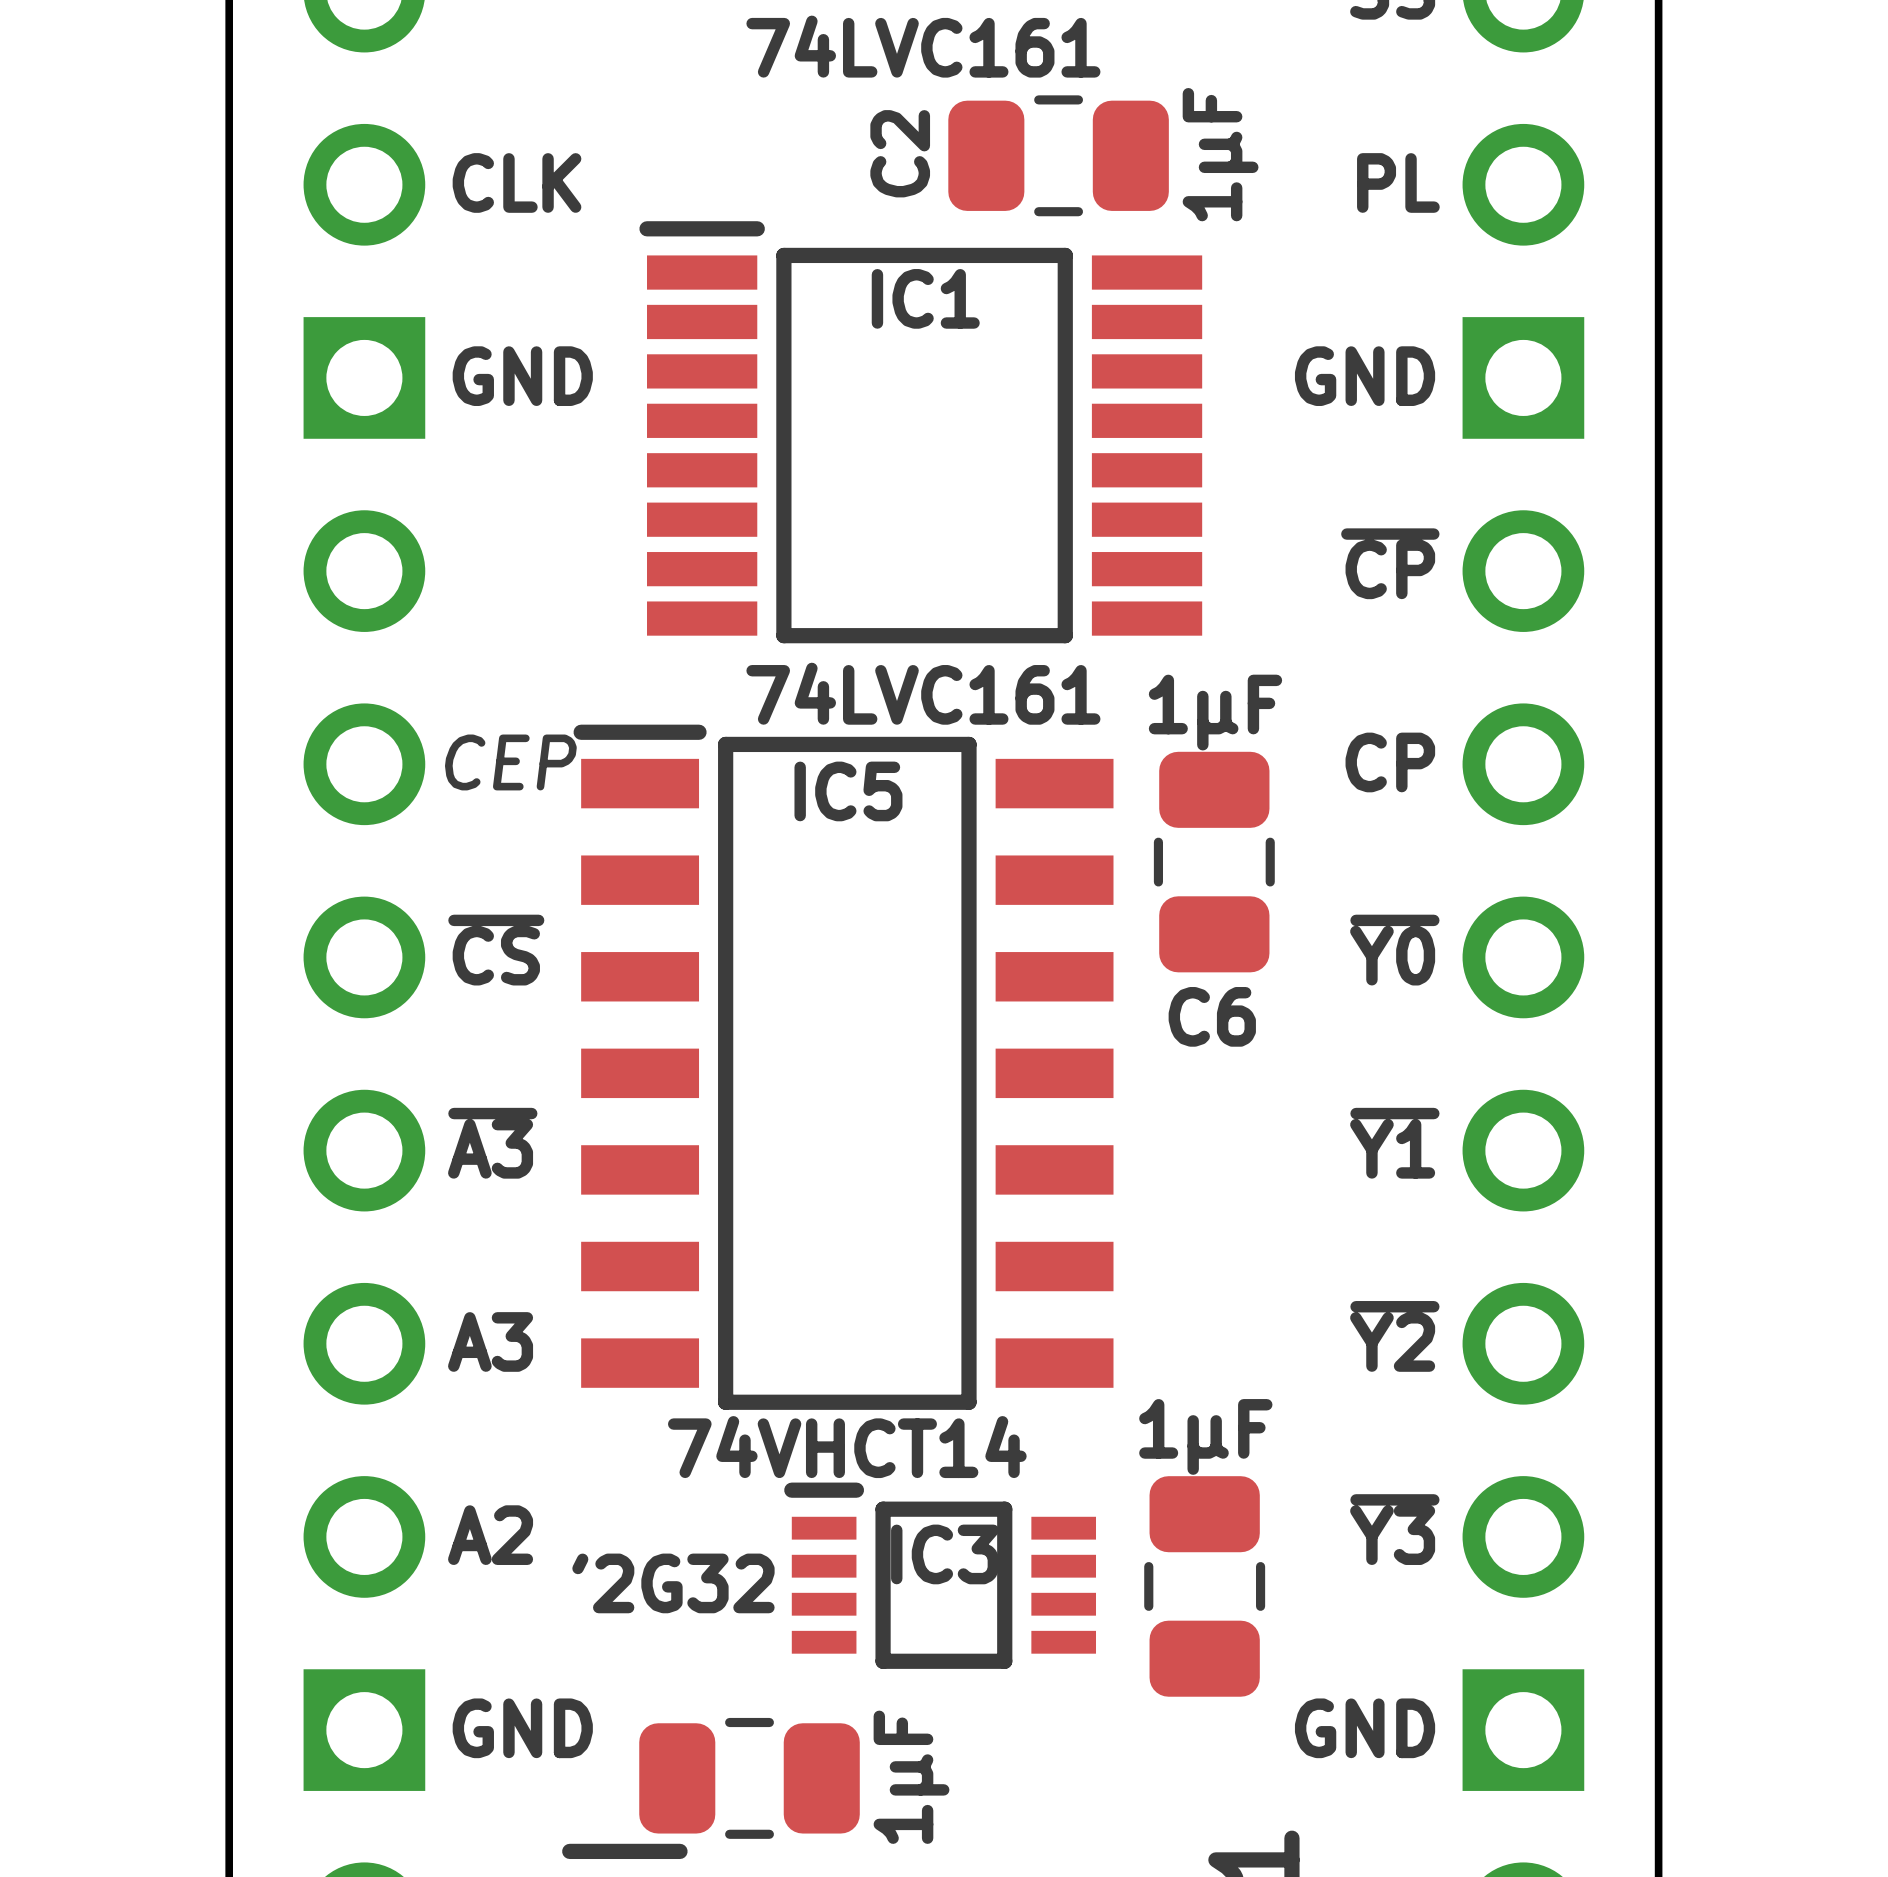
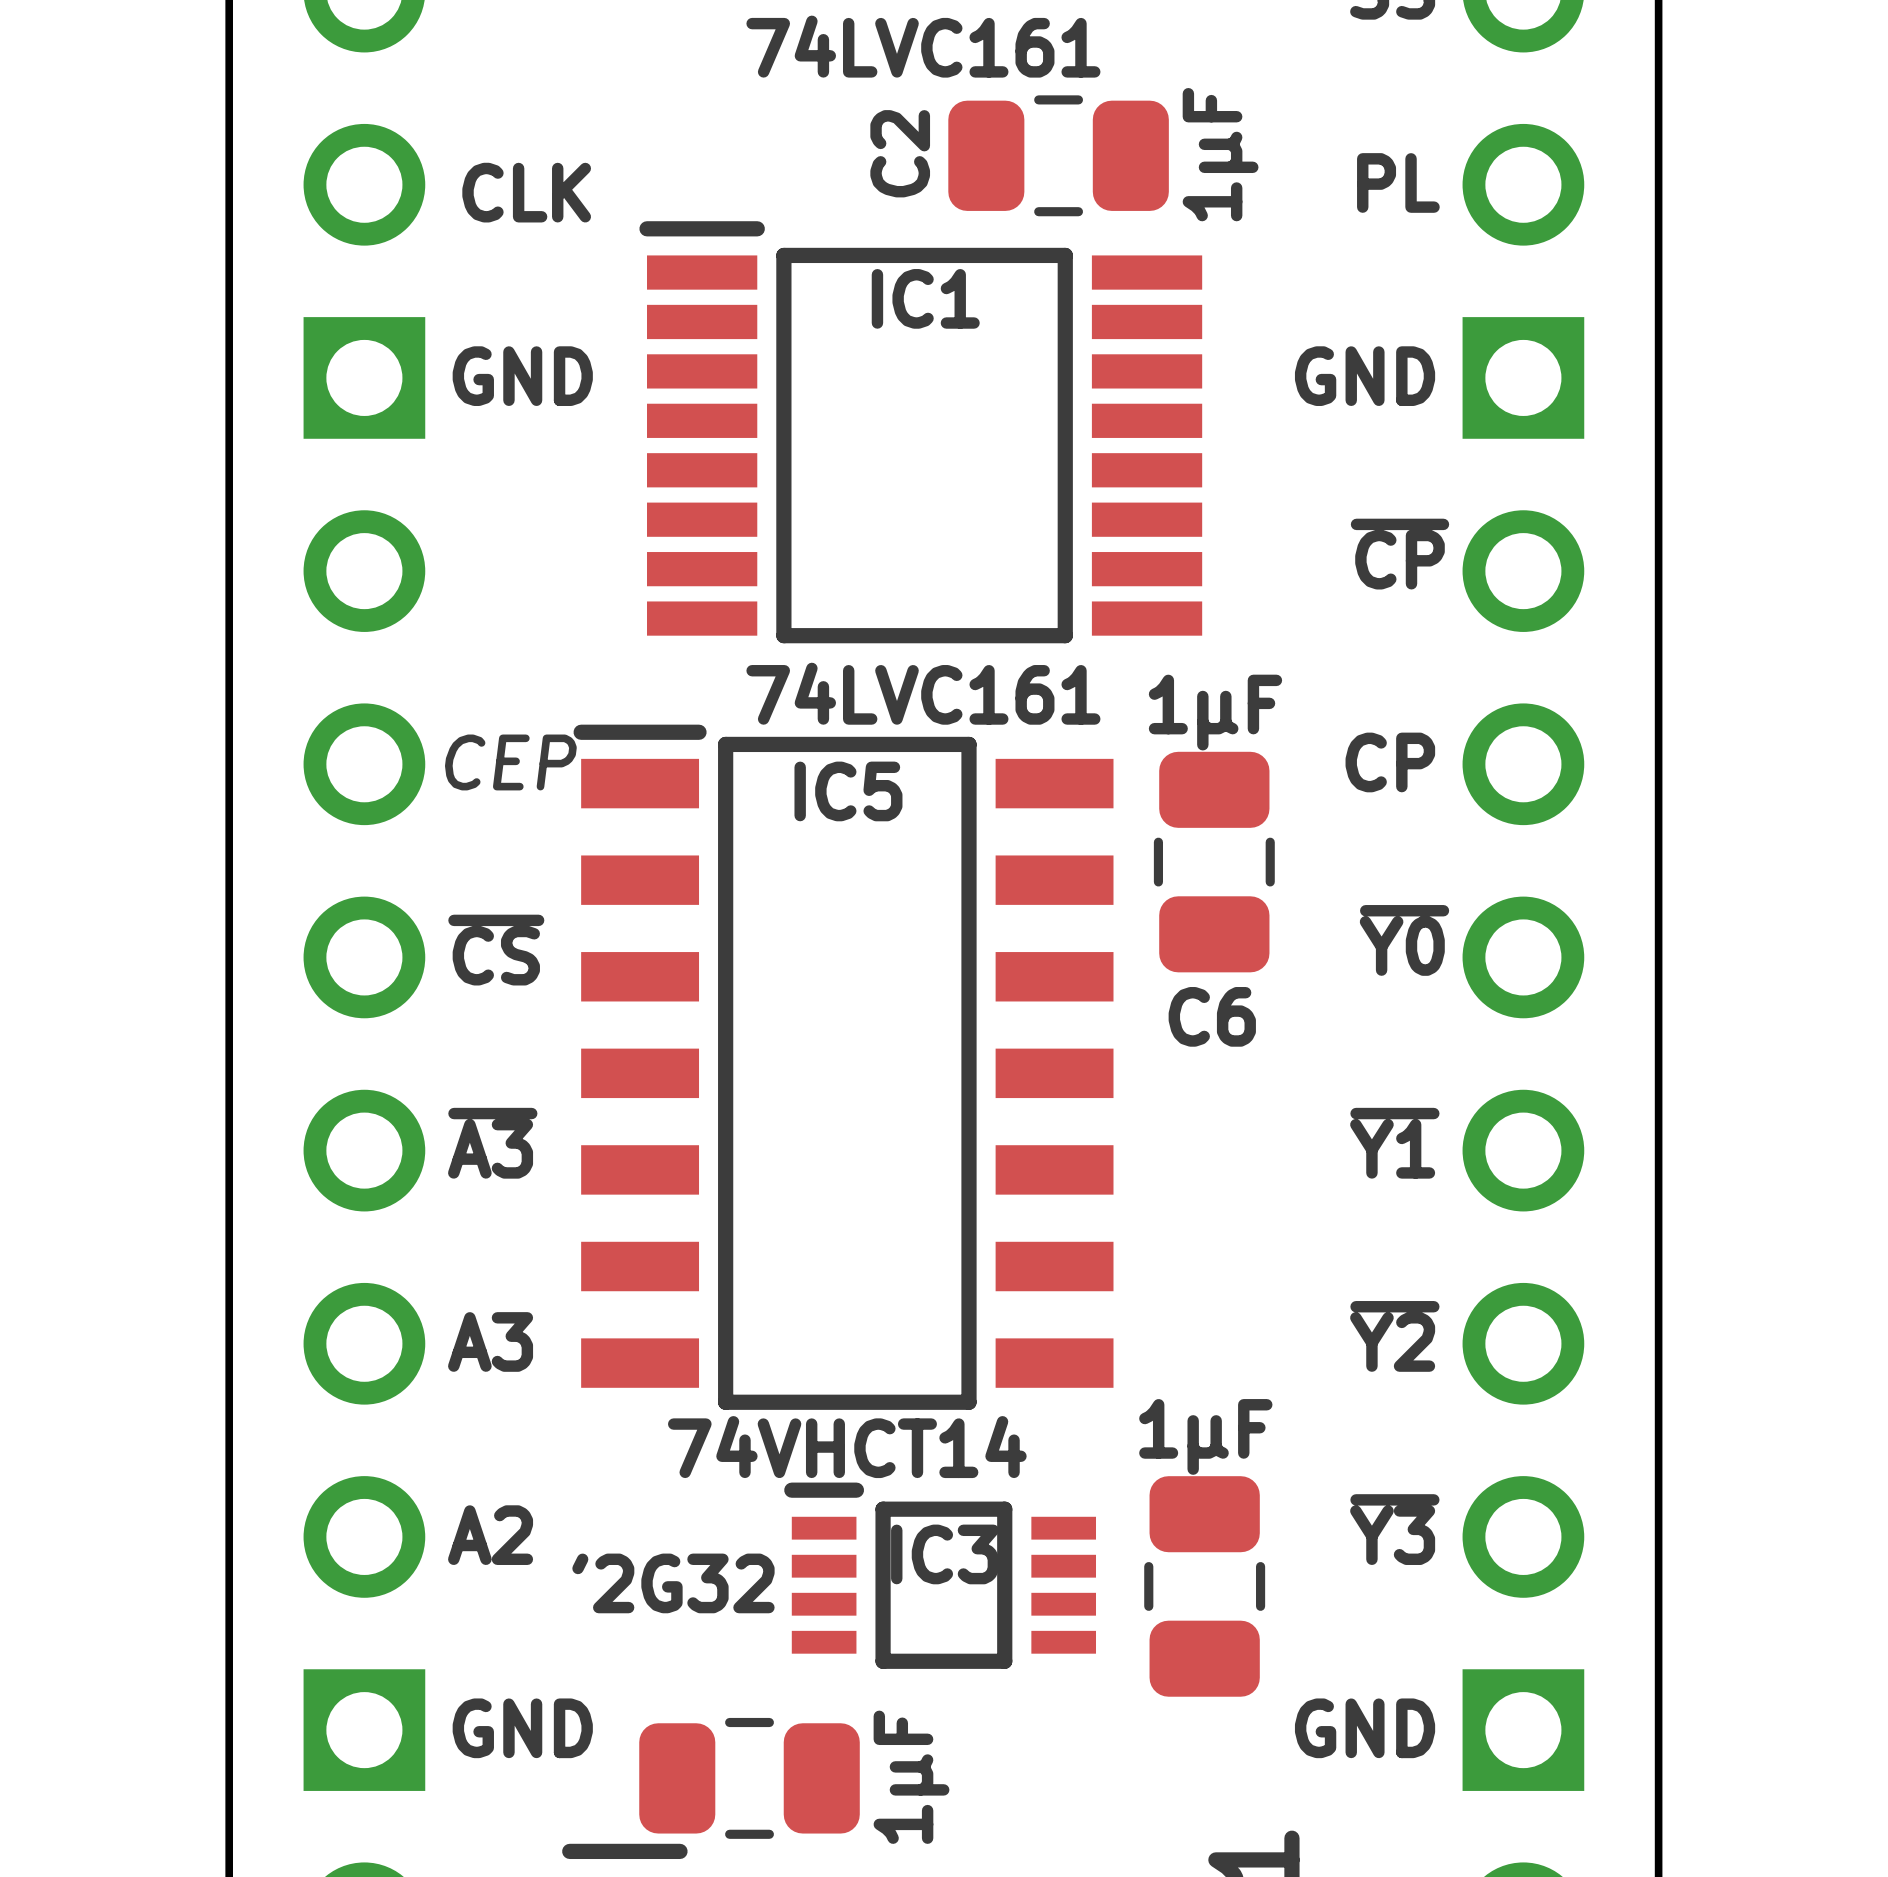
text position: CLK (517, 182) -> CLK (526, 192)
text position: ~{CP} (1390, 563) -> ~{CP} (1399, 554)
text position: ~{Y0} (1394, 950) -> ~{Y0} (1404, 940)

